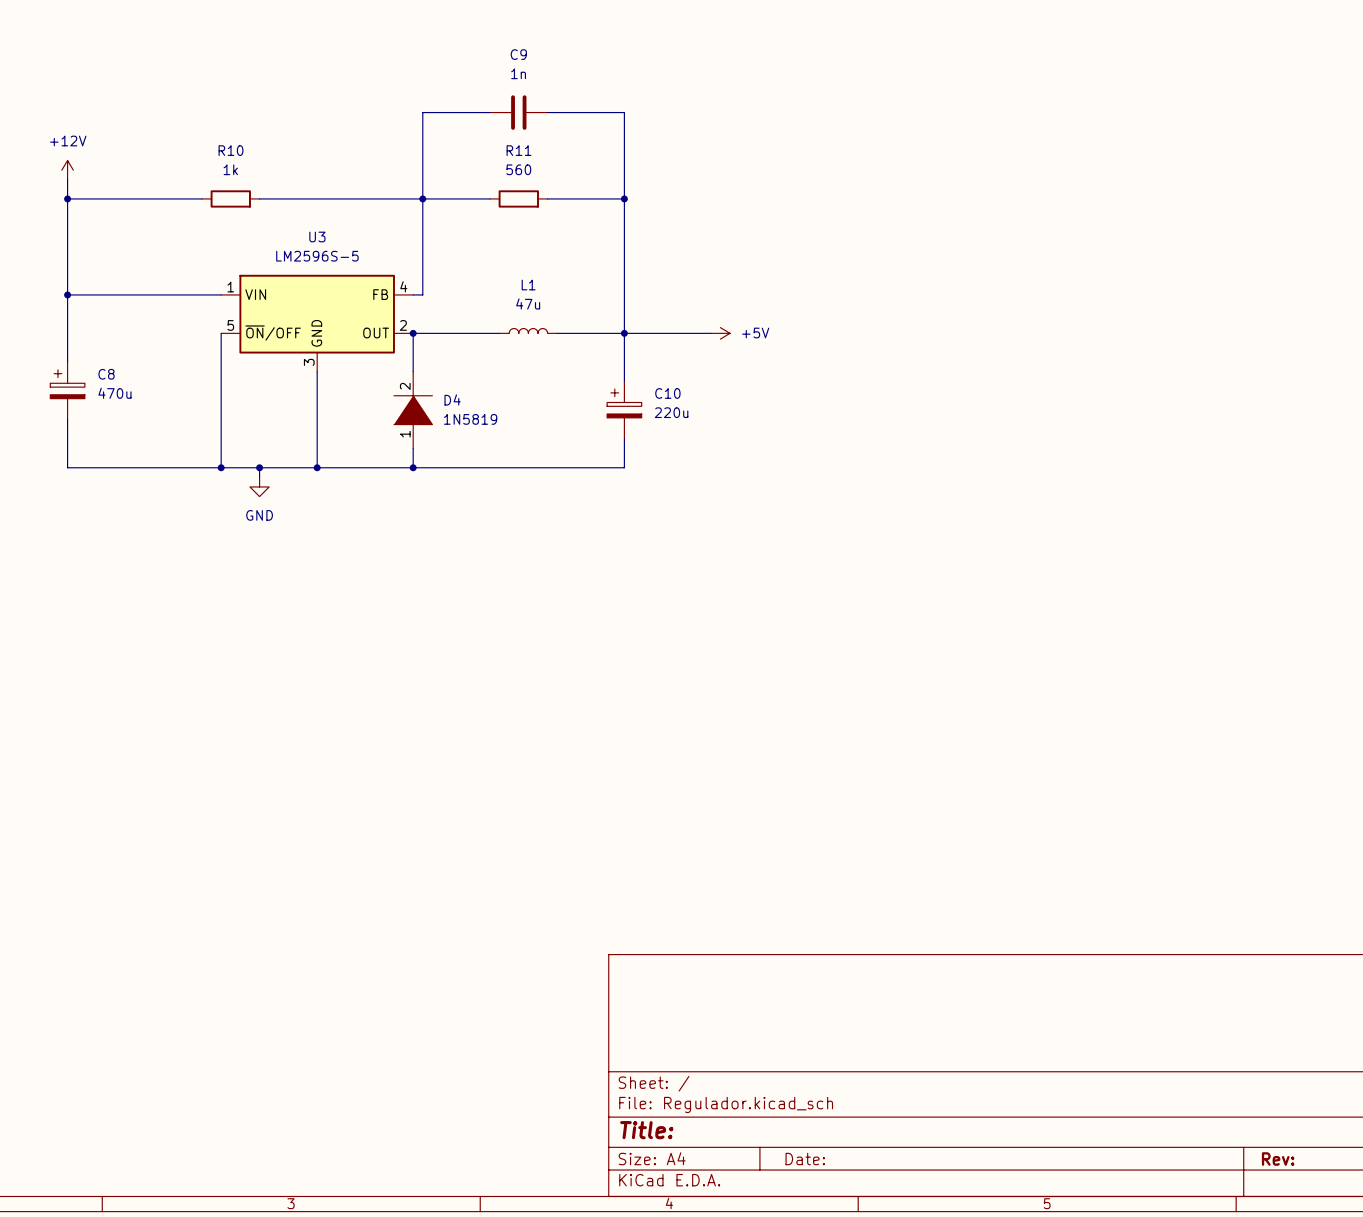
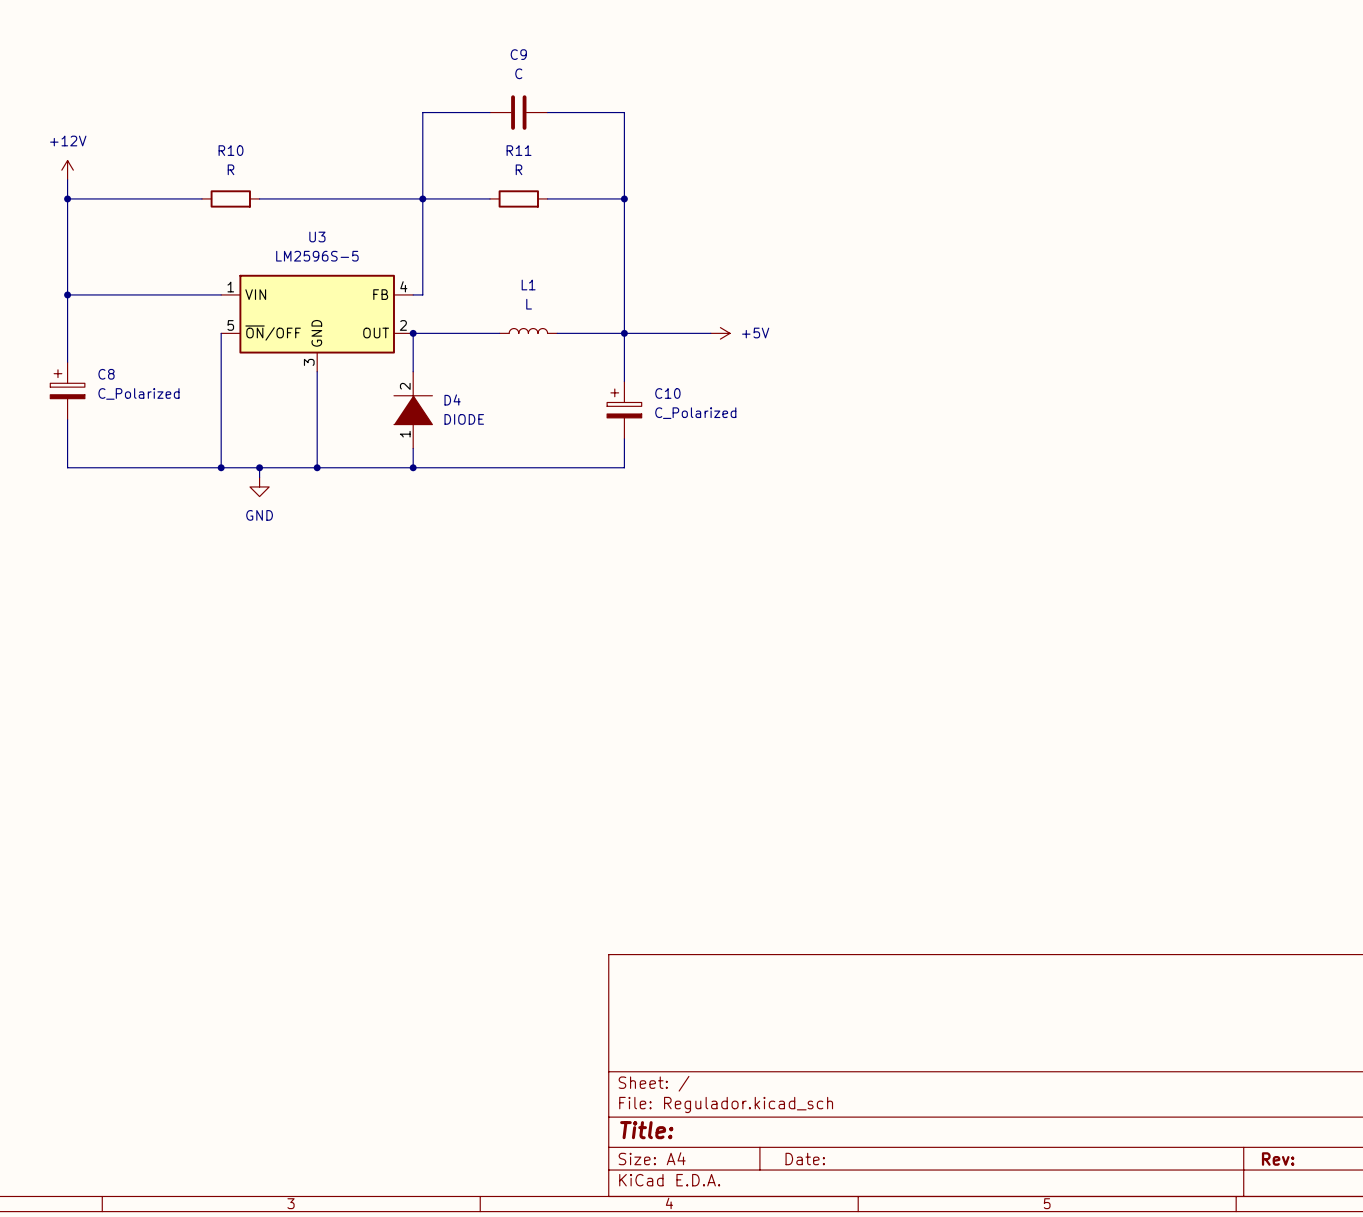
C9 value: 1n (518, 73) -> C (518, 73)
R10 value: 1k (230, 169) -> R (231, 169)
R11 value: 560 (518, 169) -> R (519, 169)
L1 value: 47u (528, 303) -> L (529, 304)
C8 value: 470u (114, 393) -> C_Polarized (138, 393)
C10 value: 220u (671, 412) -> C_Polarized (695, 413)
D4 value: 1N5819 (470, 419) -> DIODE (464, 419)

